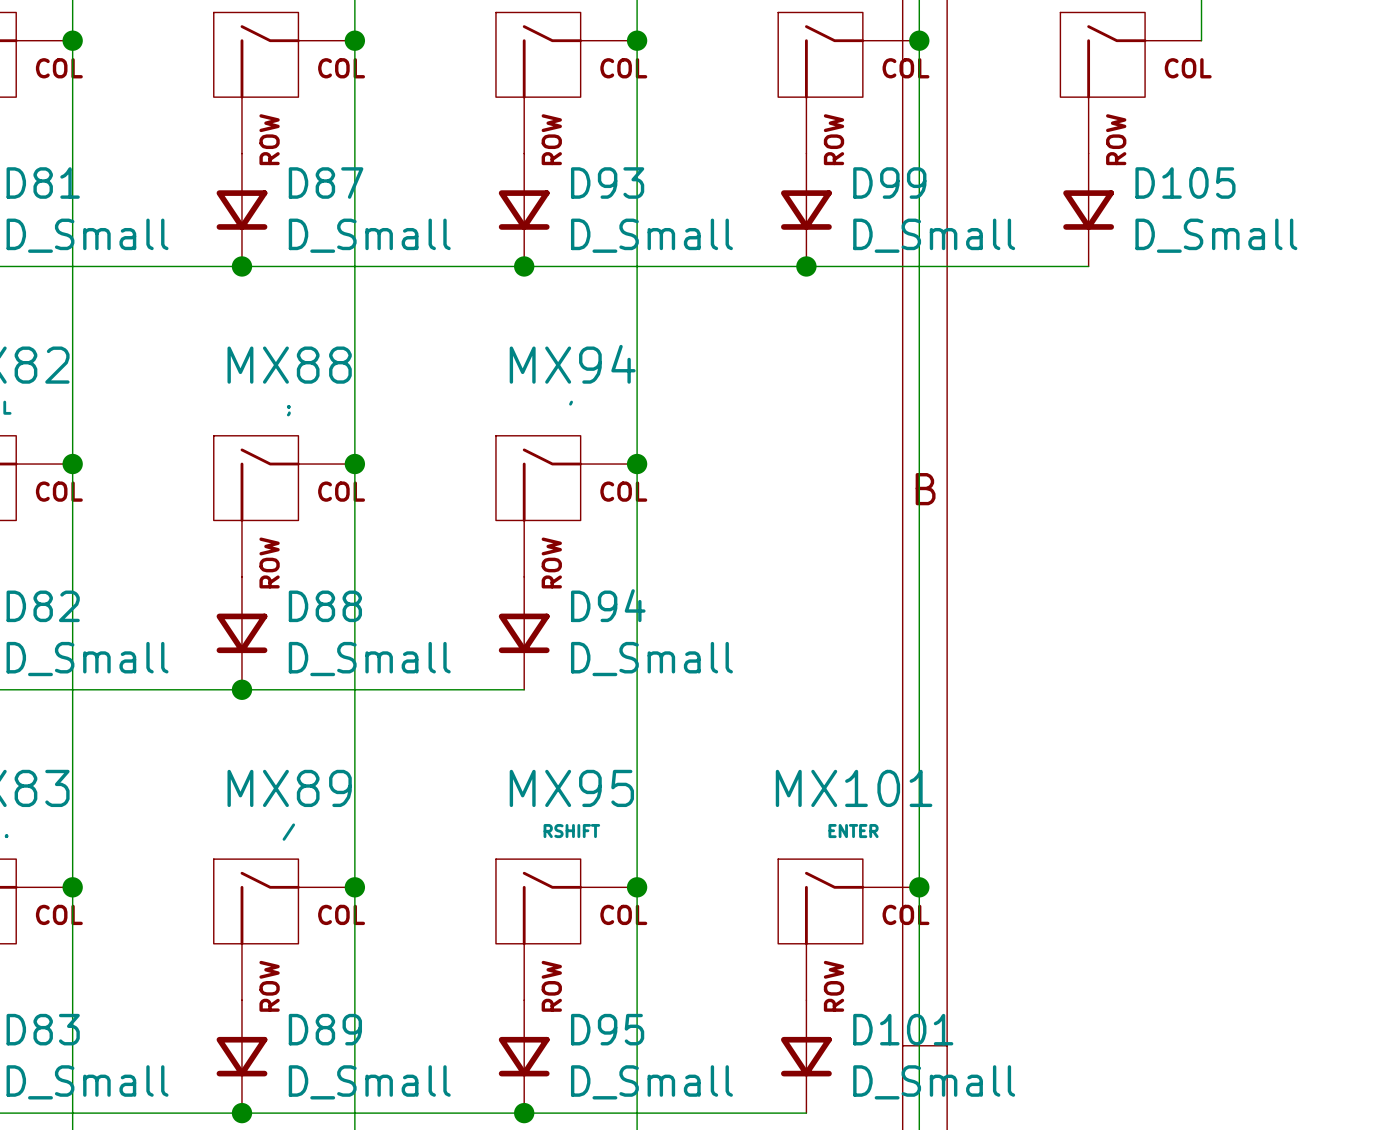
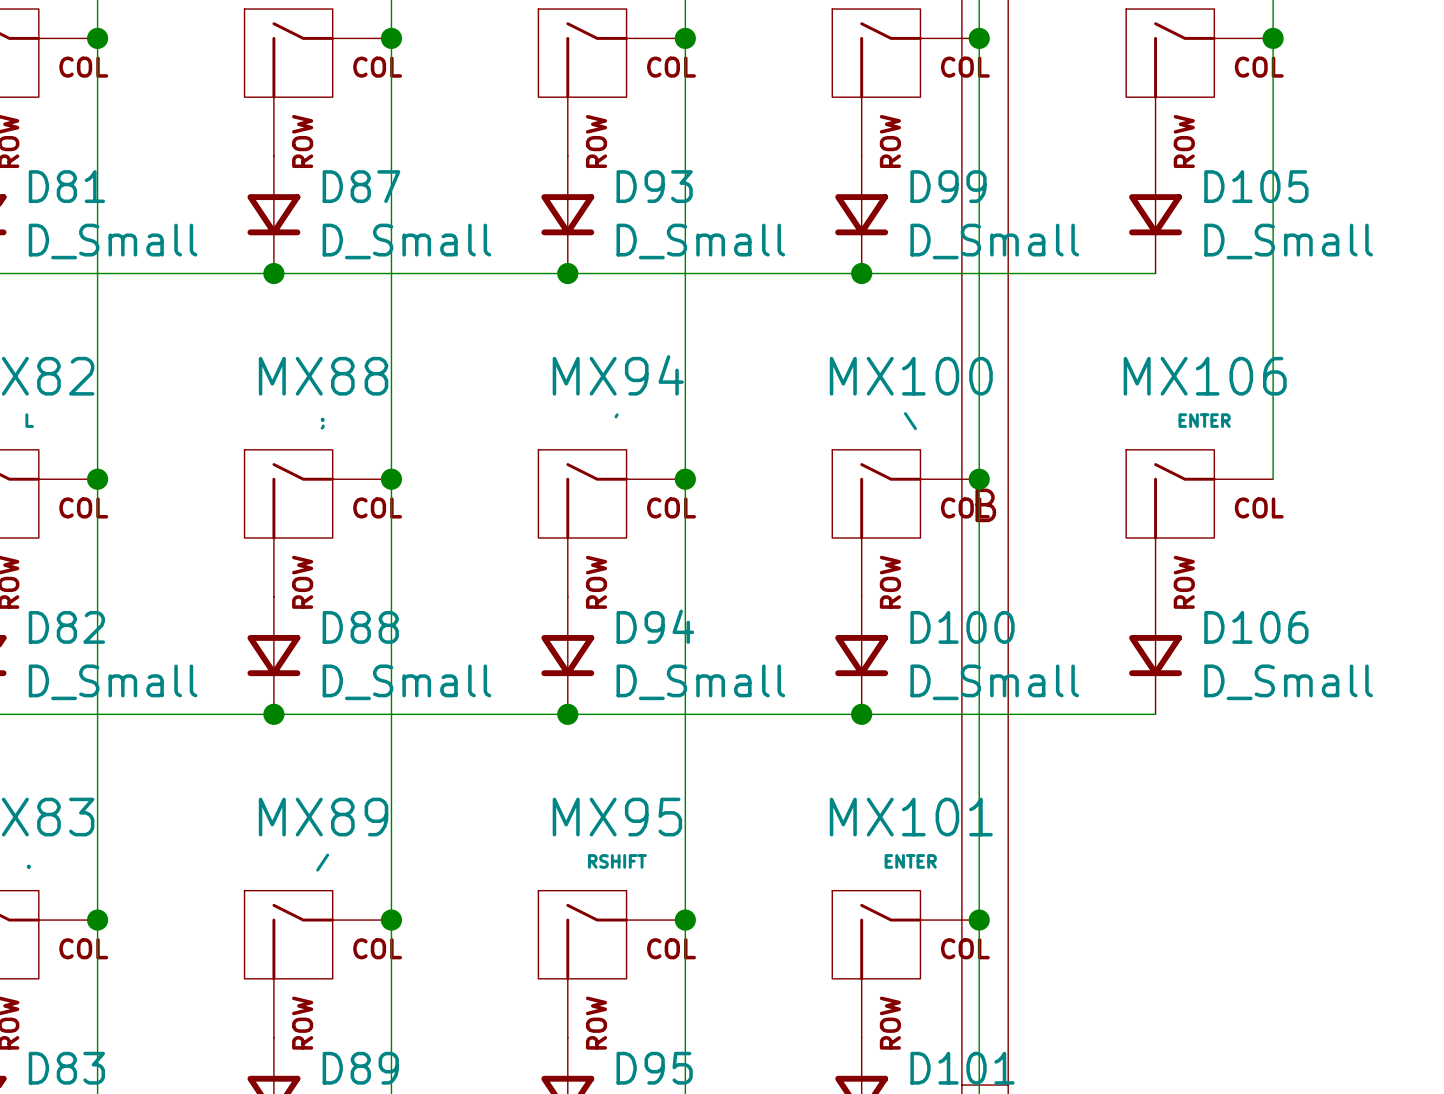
wire: none -> (1273, 38) (1273, 479)
junction: none -> (1273, 38)
junction: none -> (979, 479)
MX100: none -> \ (905, 523)
MX106: none -> ENTER (1199, 523)
D100: none -> D_Small (861, 655)
D106: none -> D_Small (1155, 655)
wire: none -> (567, 714) (1155, 714)
junction: none -> (567, 714)
junction: none -> (861, 714)

